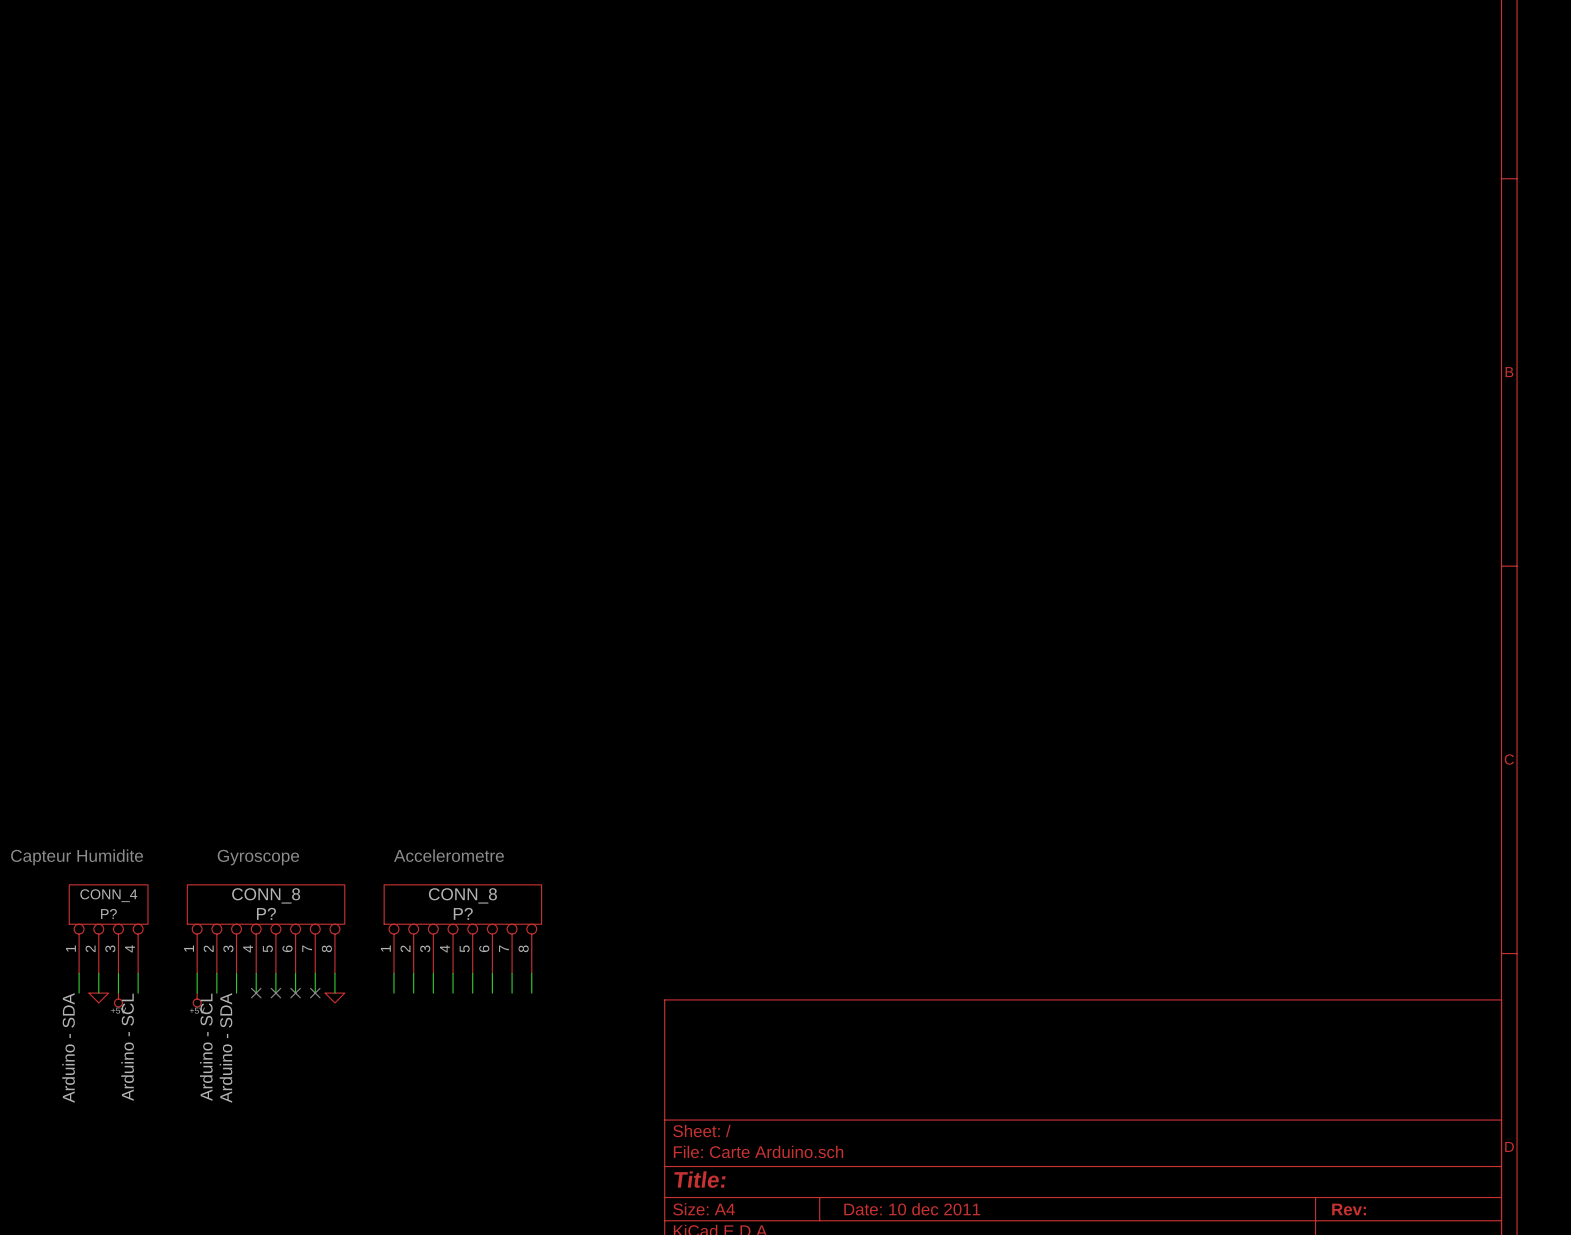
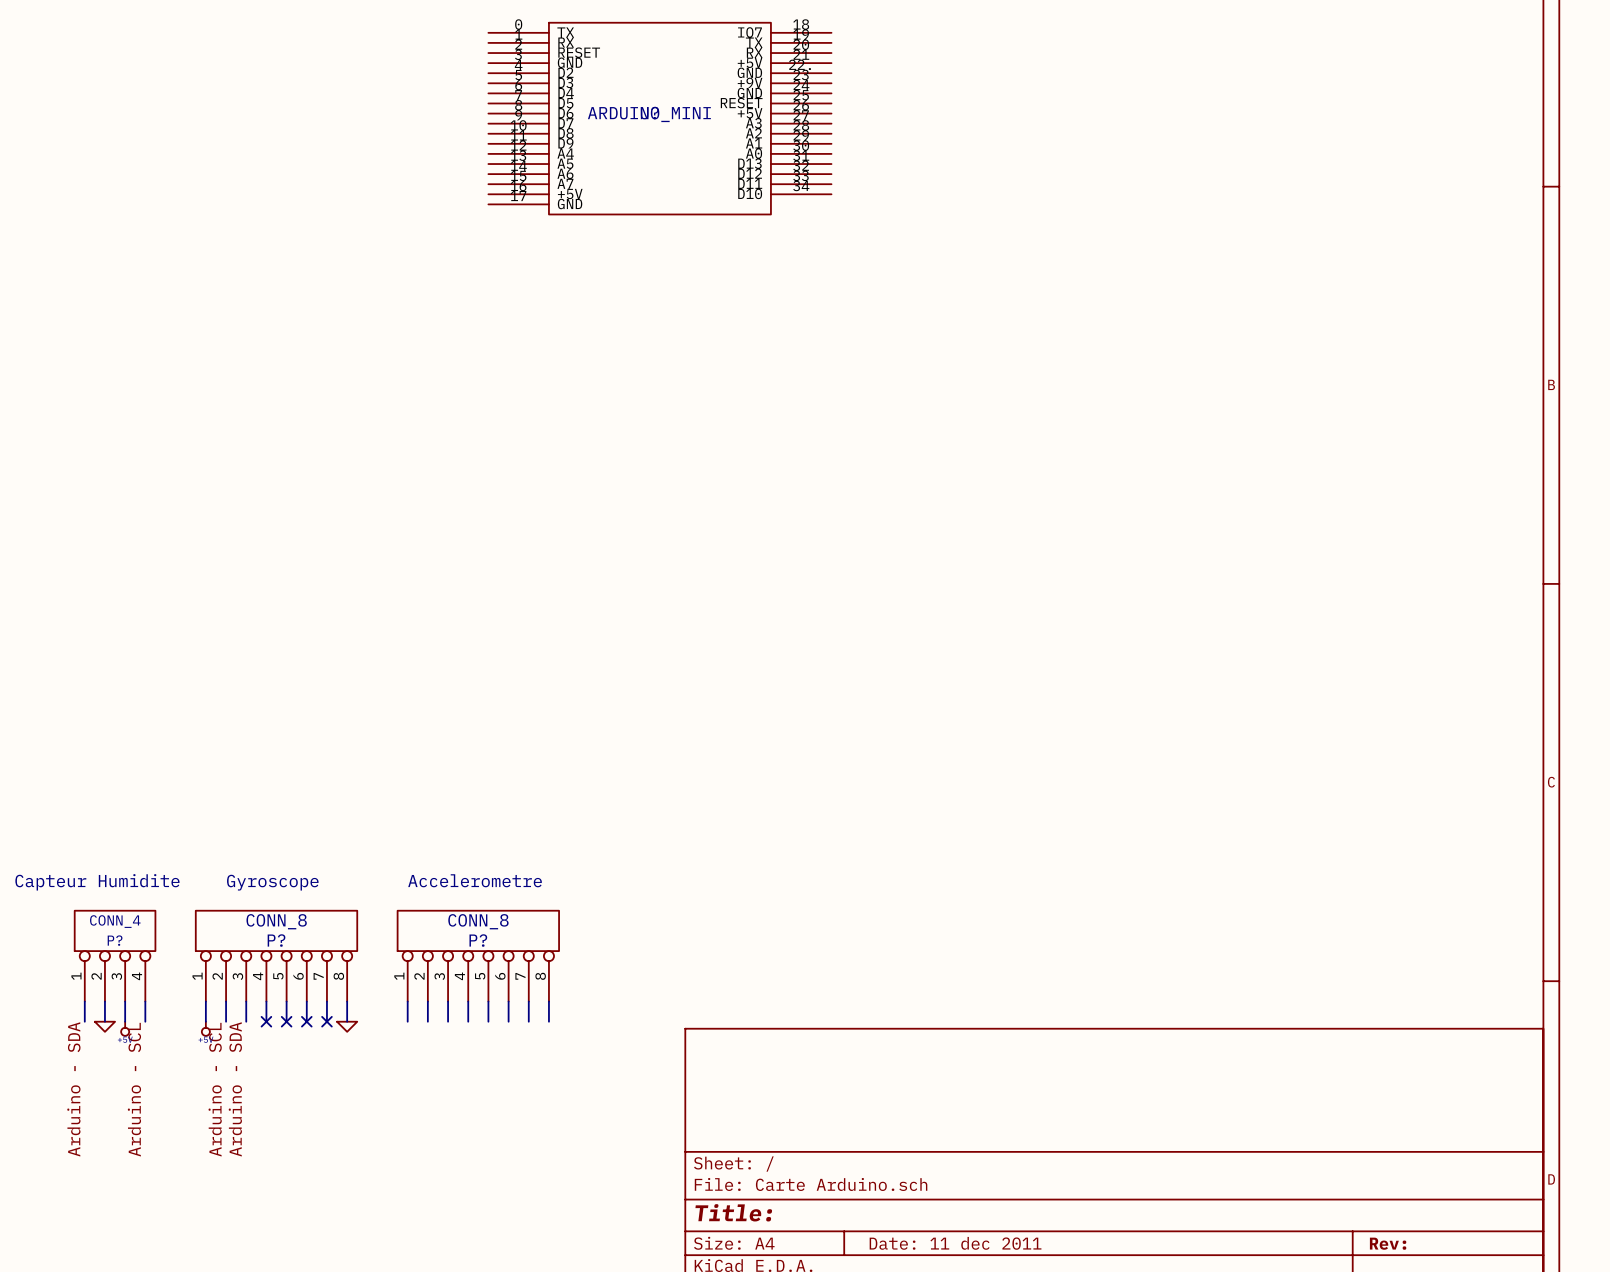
part: none -> ARDUINO_MINI (659, 118)
title block: Date: 10 dec 2011 (912, 1209) -> Date: 11 dec 2011 (955, 1243)

